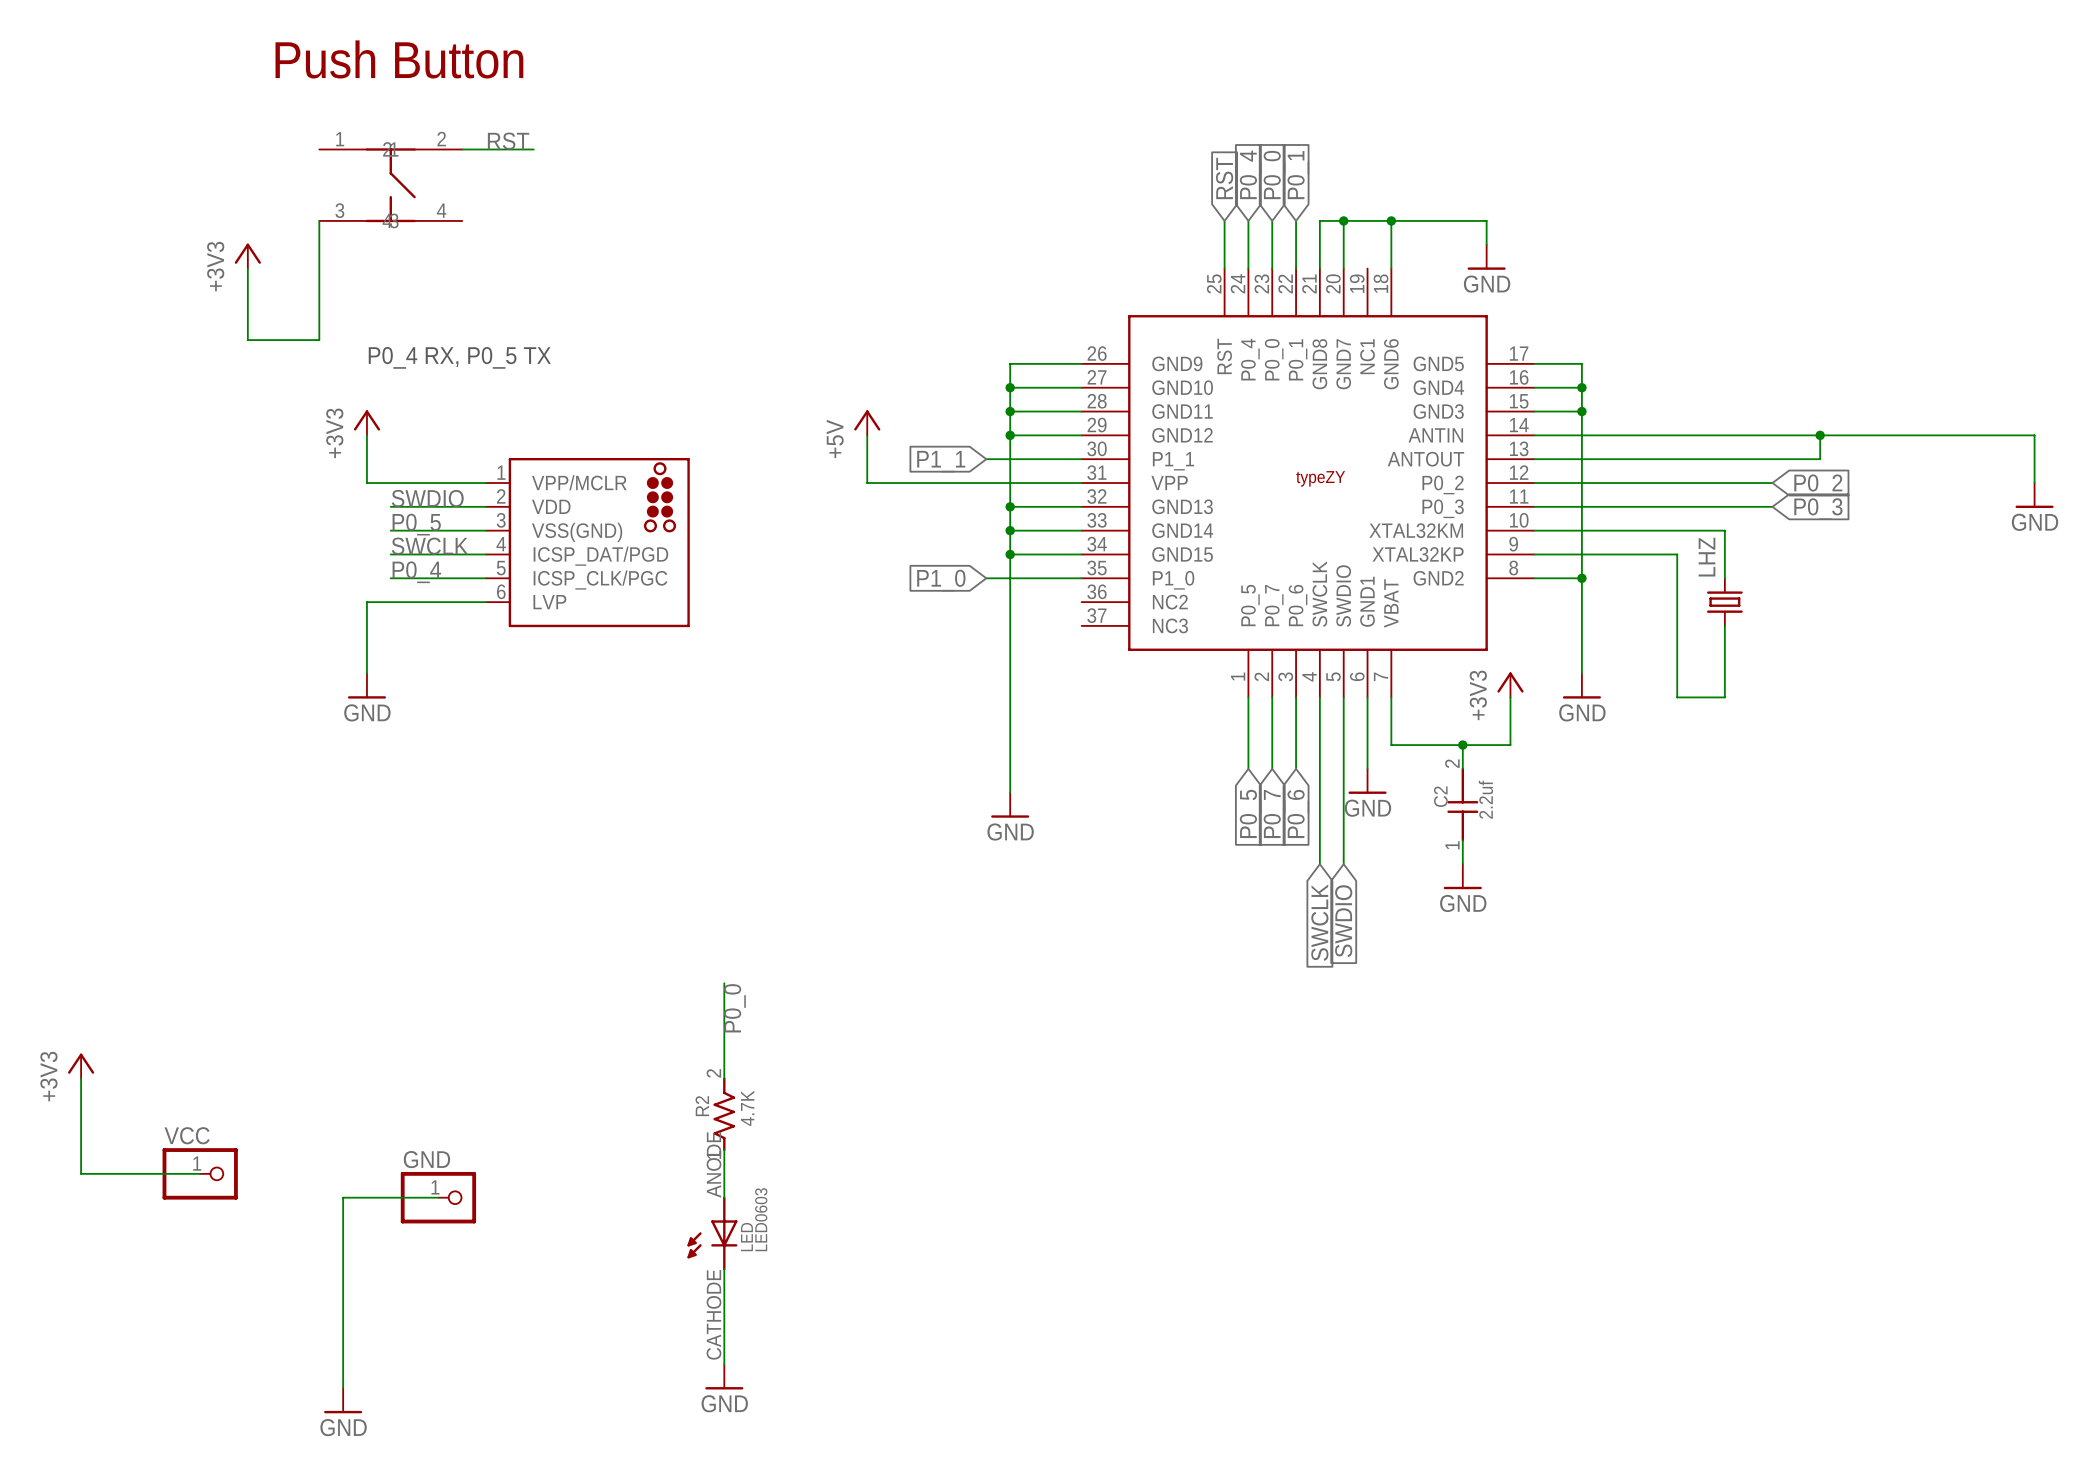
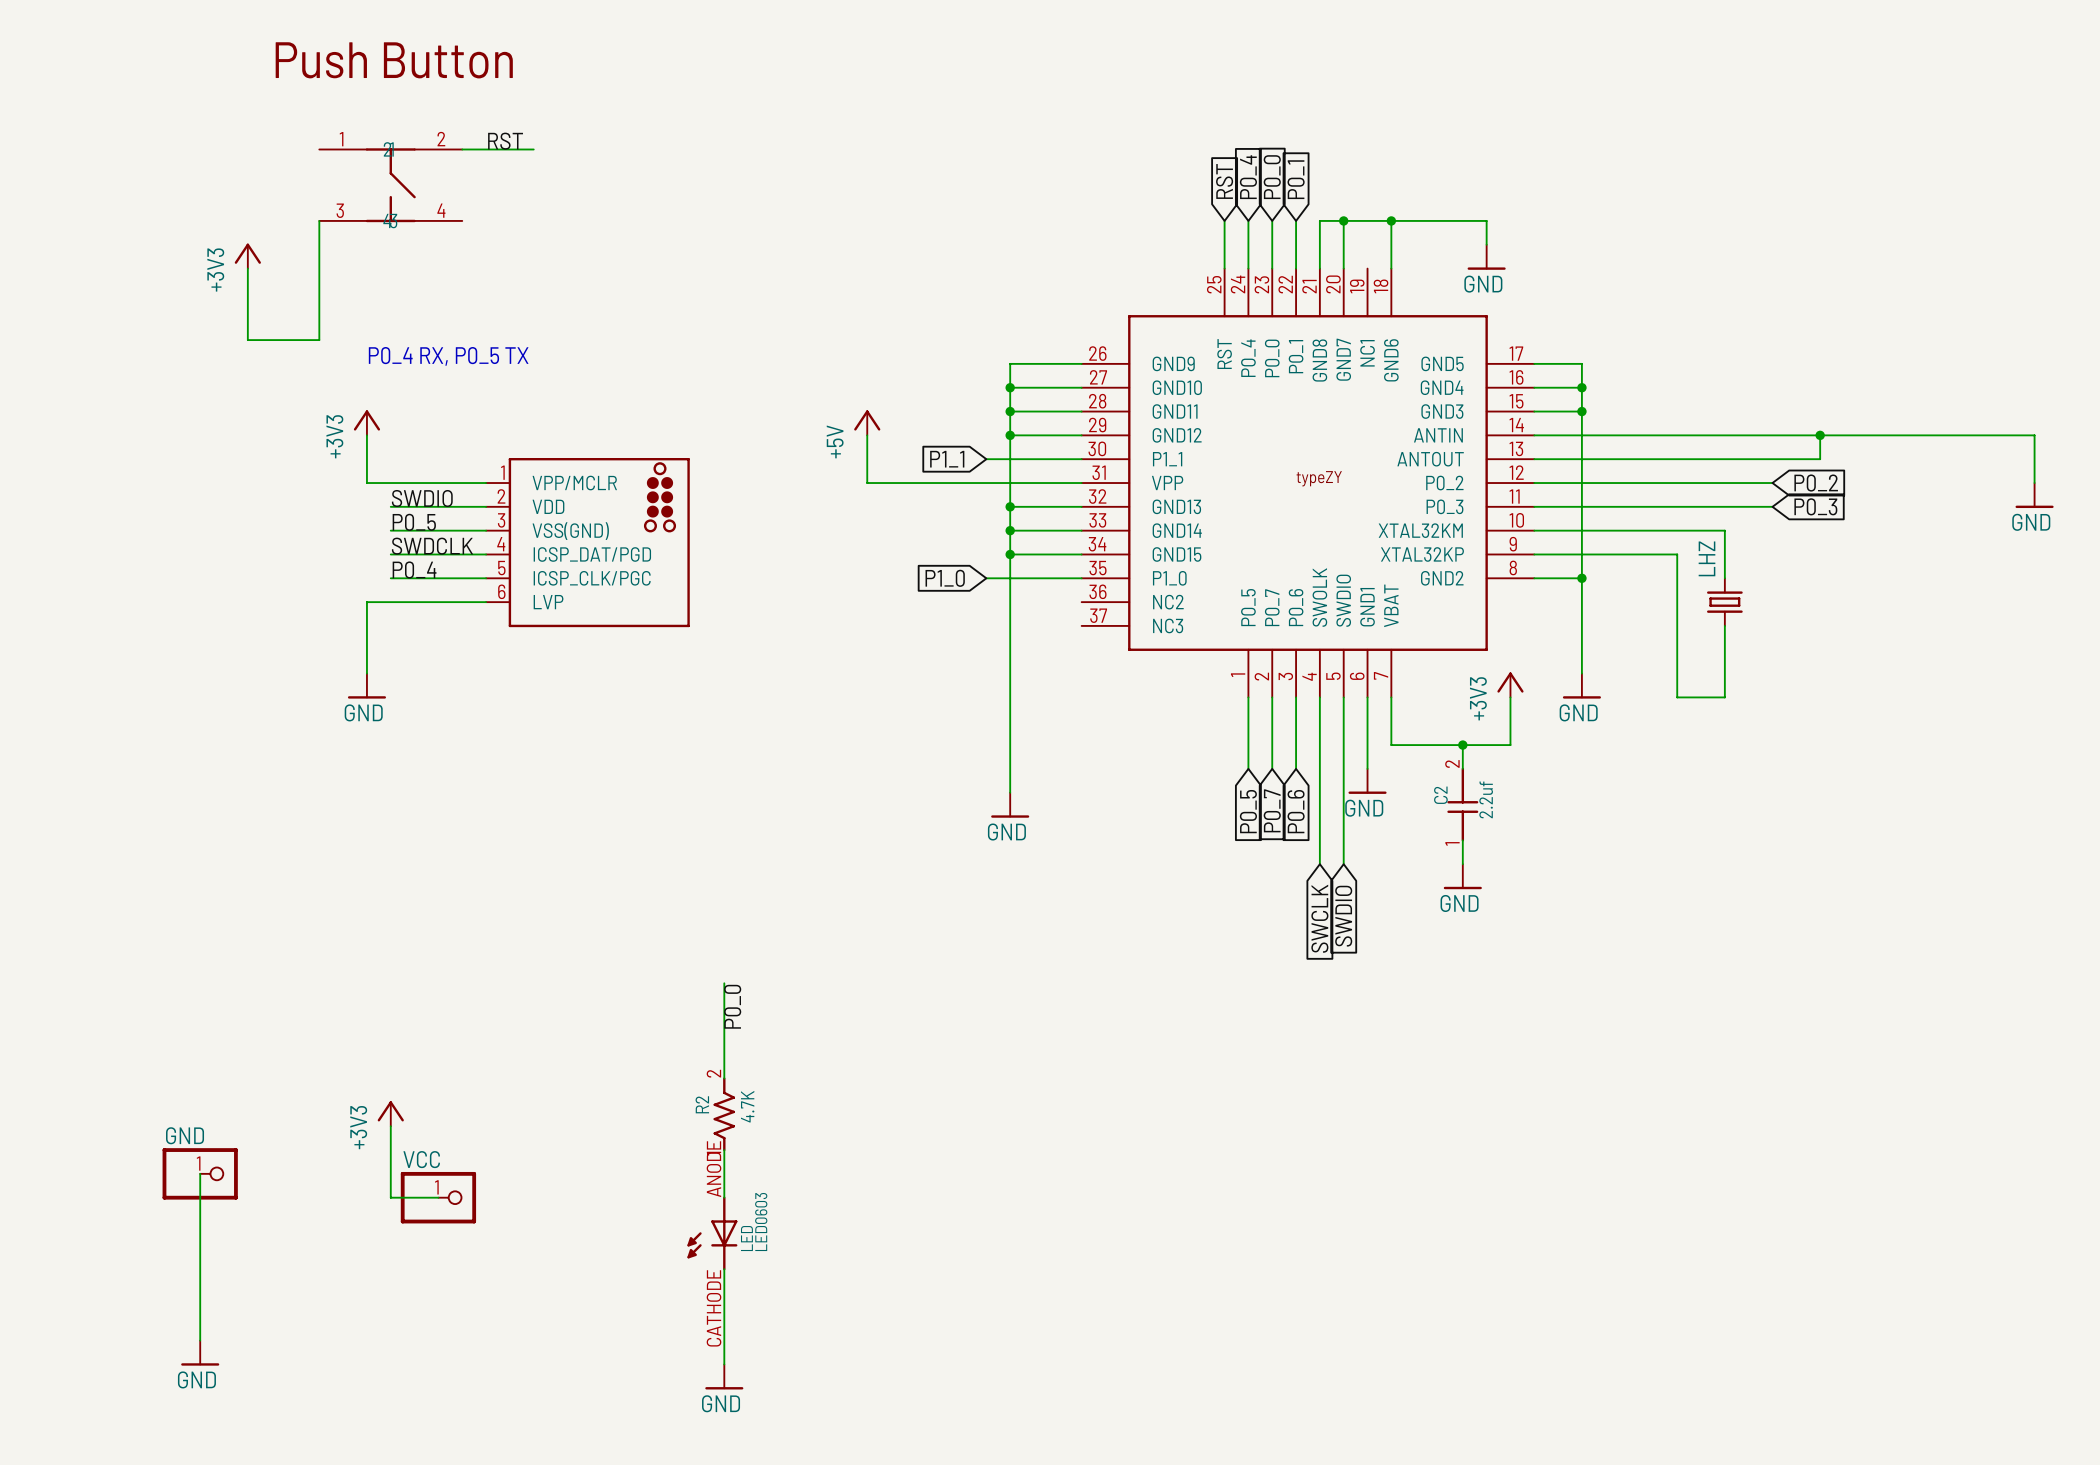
label: SWCLK (429, 546) -> SWDCLK (432, 546)
part pin name: SWCLK (1319, 594) -> SWOLK (1319, 597)
power symbol: +3V3 (81, 1066) -> none
wire: (81, 1078) (81, 1173) (200, 1173) -> (200, 1340) (200, 1173)
power symbol: none -> +3V3 (390, 1113)
VCC name: VCC (187, 1135) -> GND (185, 1135)
GND name: GND (426, 1159) -> VCC (421, 1159)
wire: (390, 1197) (343, 1197) (343, 1388) -> (390, 1197) (390, 1126)
power symbol position: GND (343, 1400) -> GND (200, 1353)

